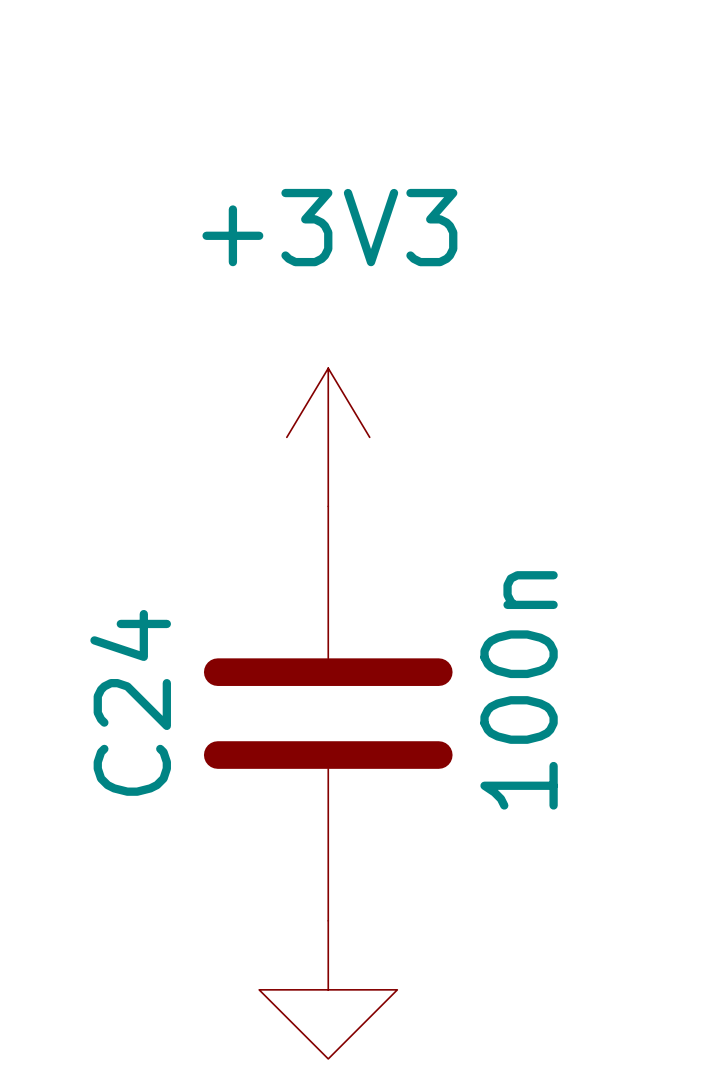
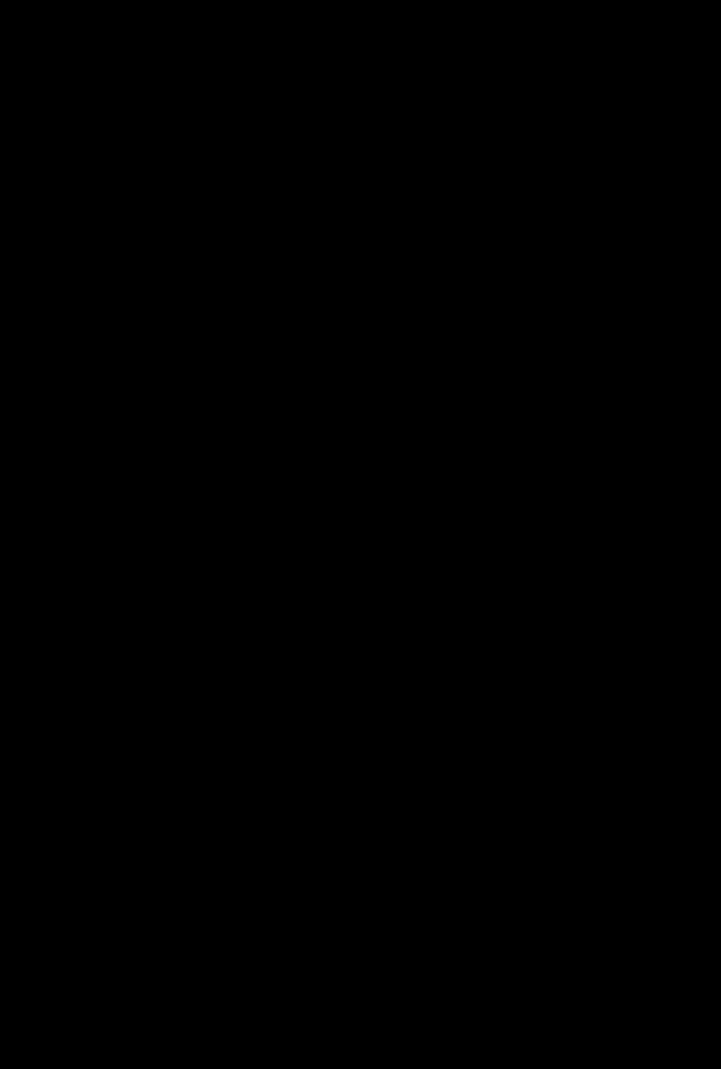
power symbol: +3V3 (328, 437) -> none
C24: 100n (328, 713) -> none
power symbol: (328, 989) -> none

